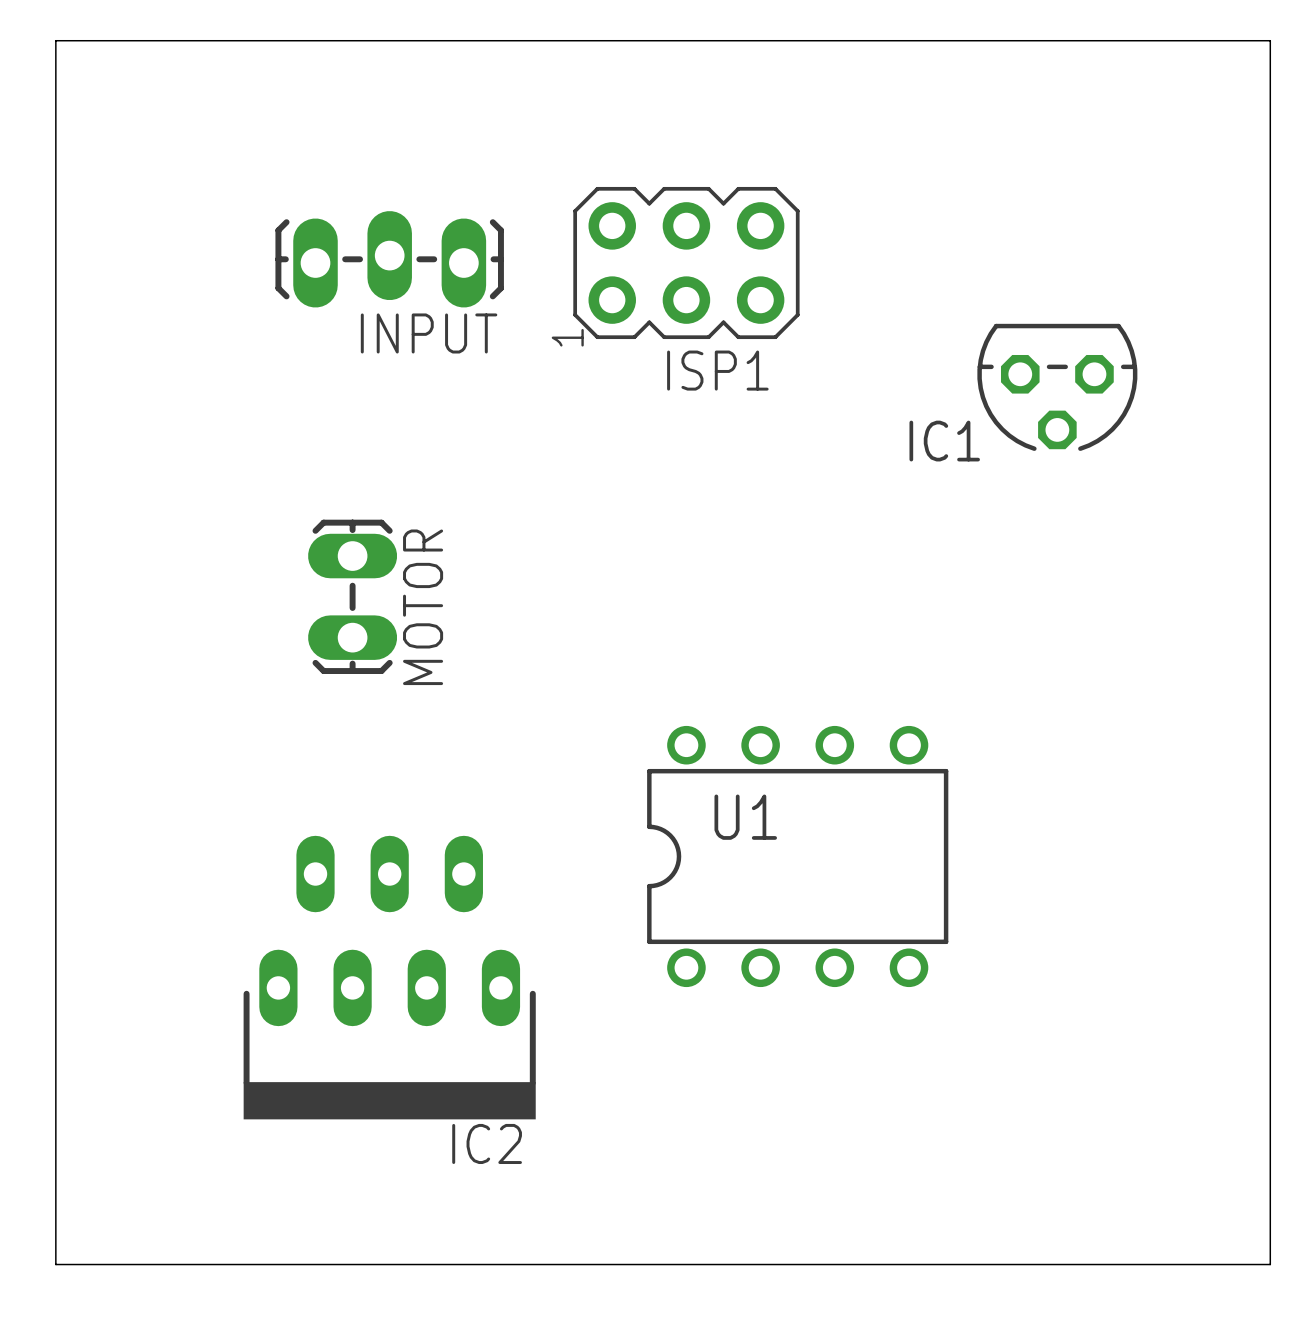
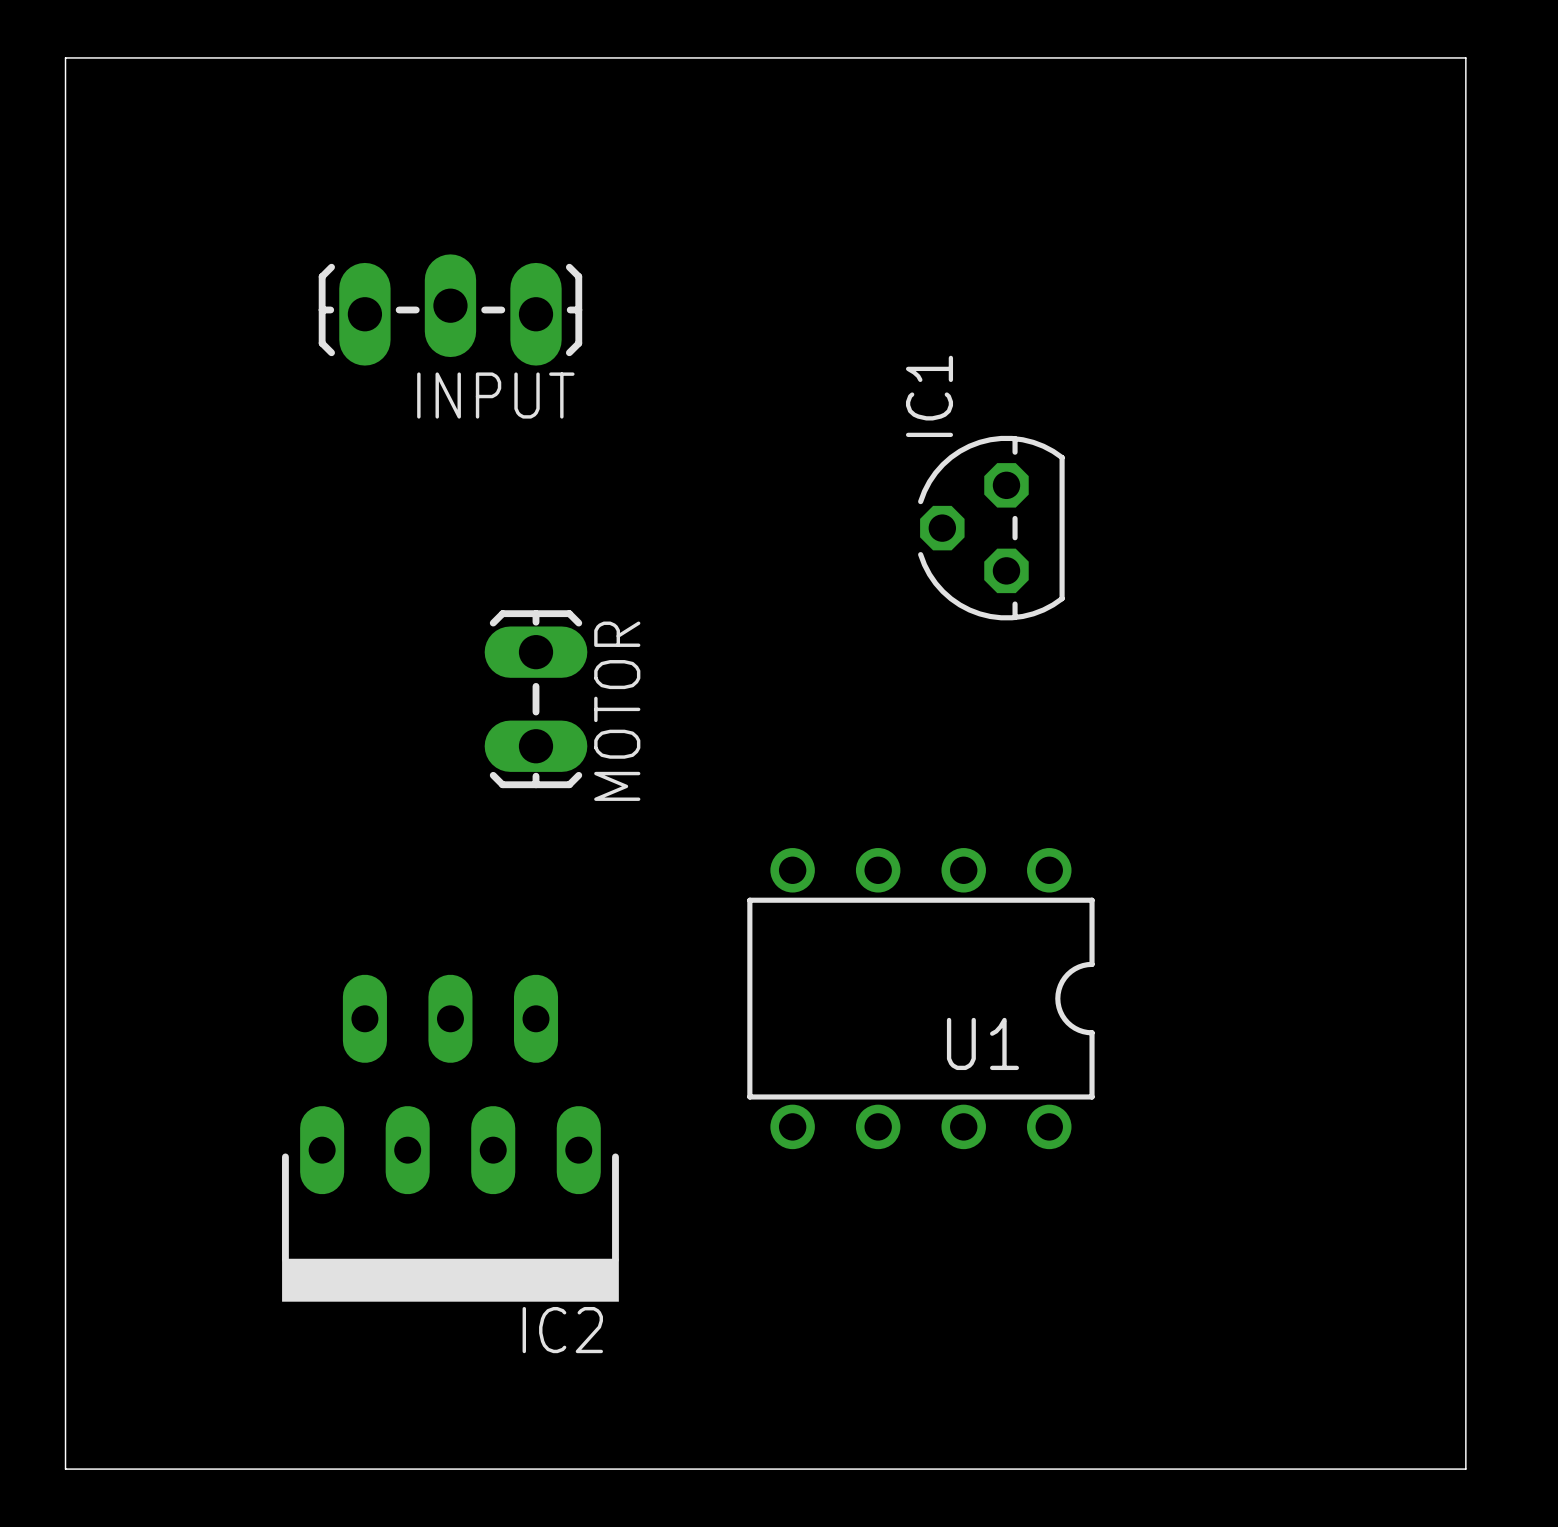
ISP1: (686, 263) -> none
IC1 rotation: 0° (1057, 387) -> 90° clockwise (991, 528)
IC1 position: (1057, 387) -> (991, 528)
MOTOR position: (352, 596) -> (536, 699)
U1 rotation: 0° (797, 856) -> 180° (920, 998)

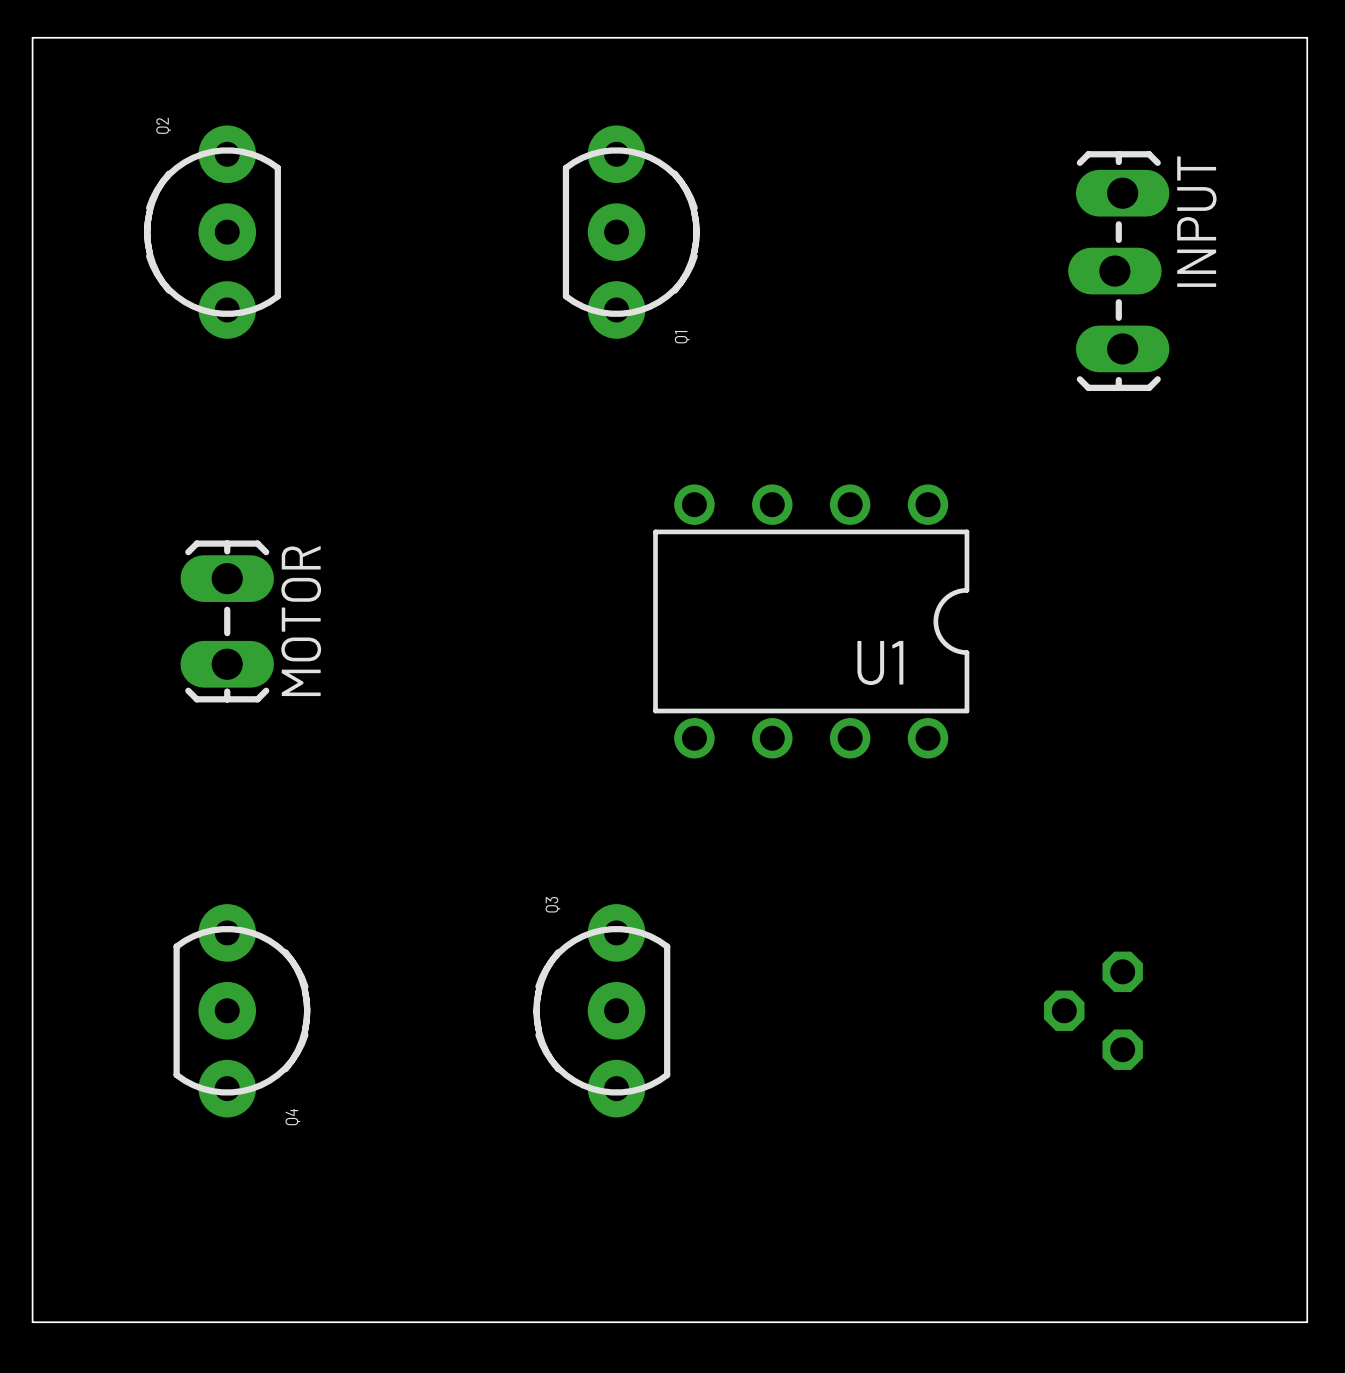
Q2: none -> (212, 232)
Q1: none -> (631, 232)
INPUT rotation: 0° (450, 309) -> 90° counterclockwise (1118, 271)
INPUT position: (450, 309) -> (1118, 271)
IC1 side: top (991, 528) -> bottom (1093, 1010)
MOTOR position: (536, 699) -> (227, 621)
U1 position: (920, 998) -> (811, 621)
Q4: none -> (241, 1010)
Q3: none -> (601, 1010)
IC2: (450, 1138) -> none

